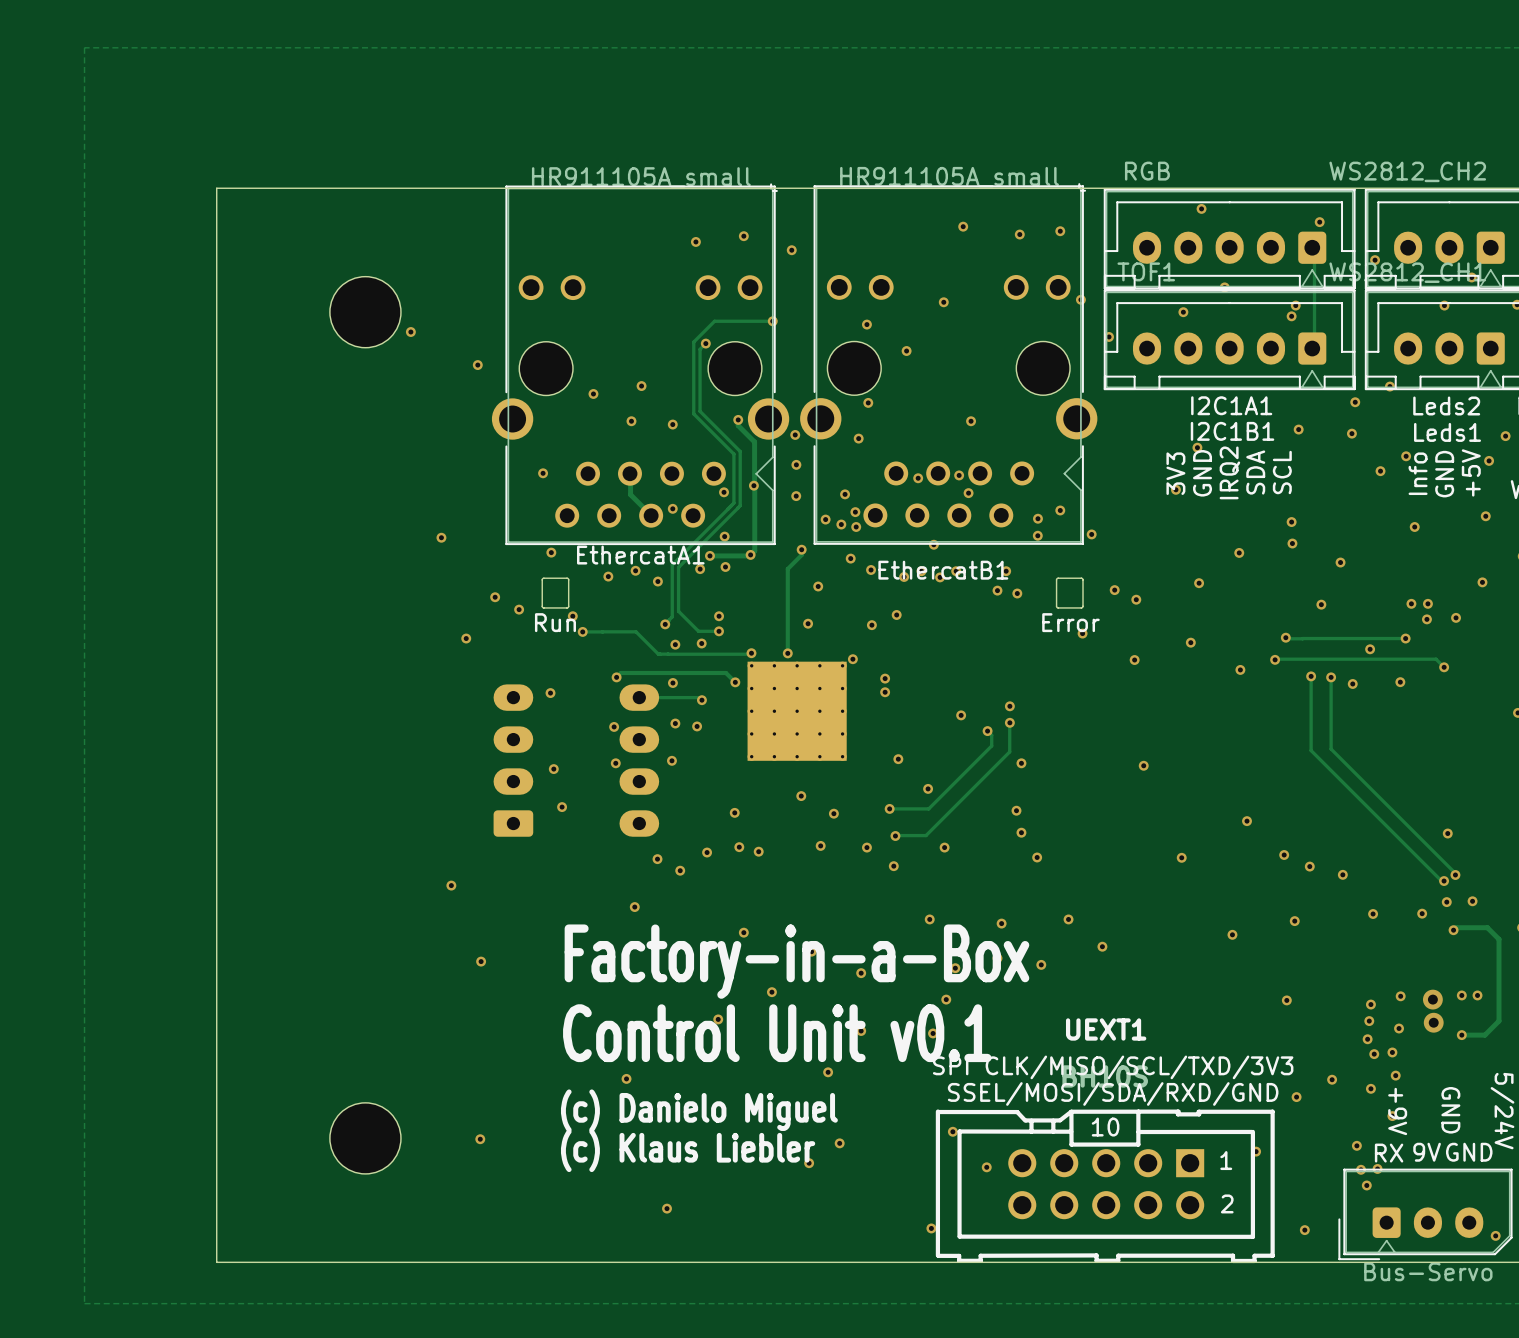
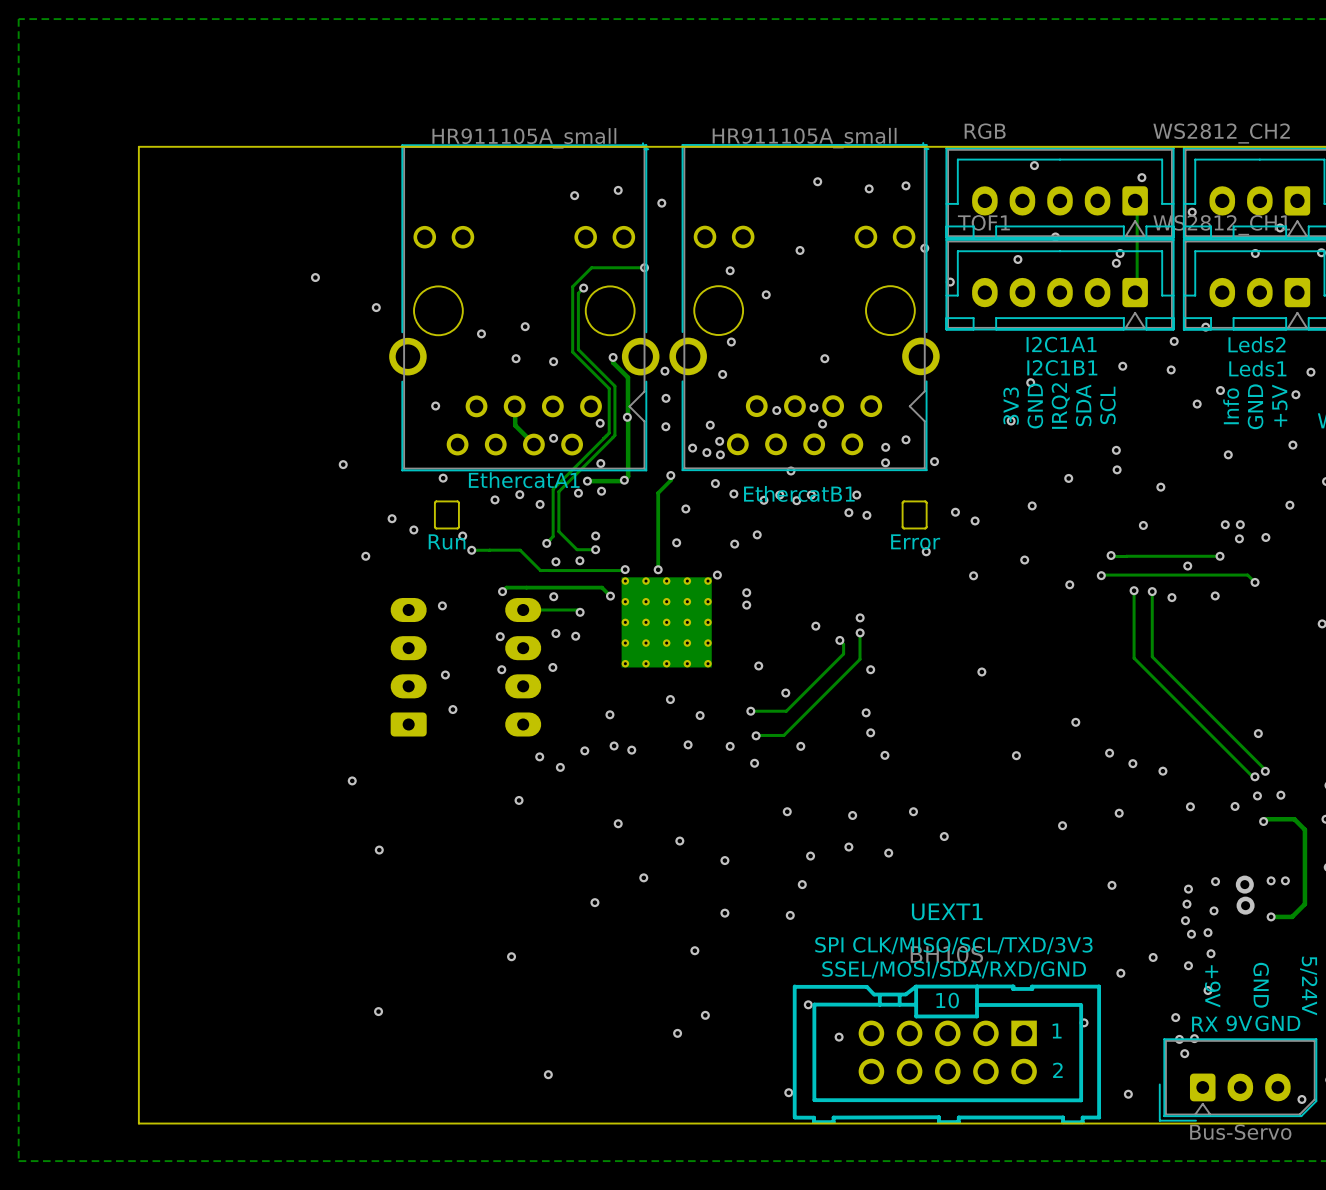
part: (365, 312) -> none
text: Factory-in-a-Box (796, 961) -> none
text: Control Unit v0.1 (777, 1033) -> none
text: (c) Danielo Miguel (699, 1110) -> none
part: (365, 1138) -> none
text: (c) Klaus Liebler (688, 1150) -> none

